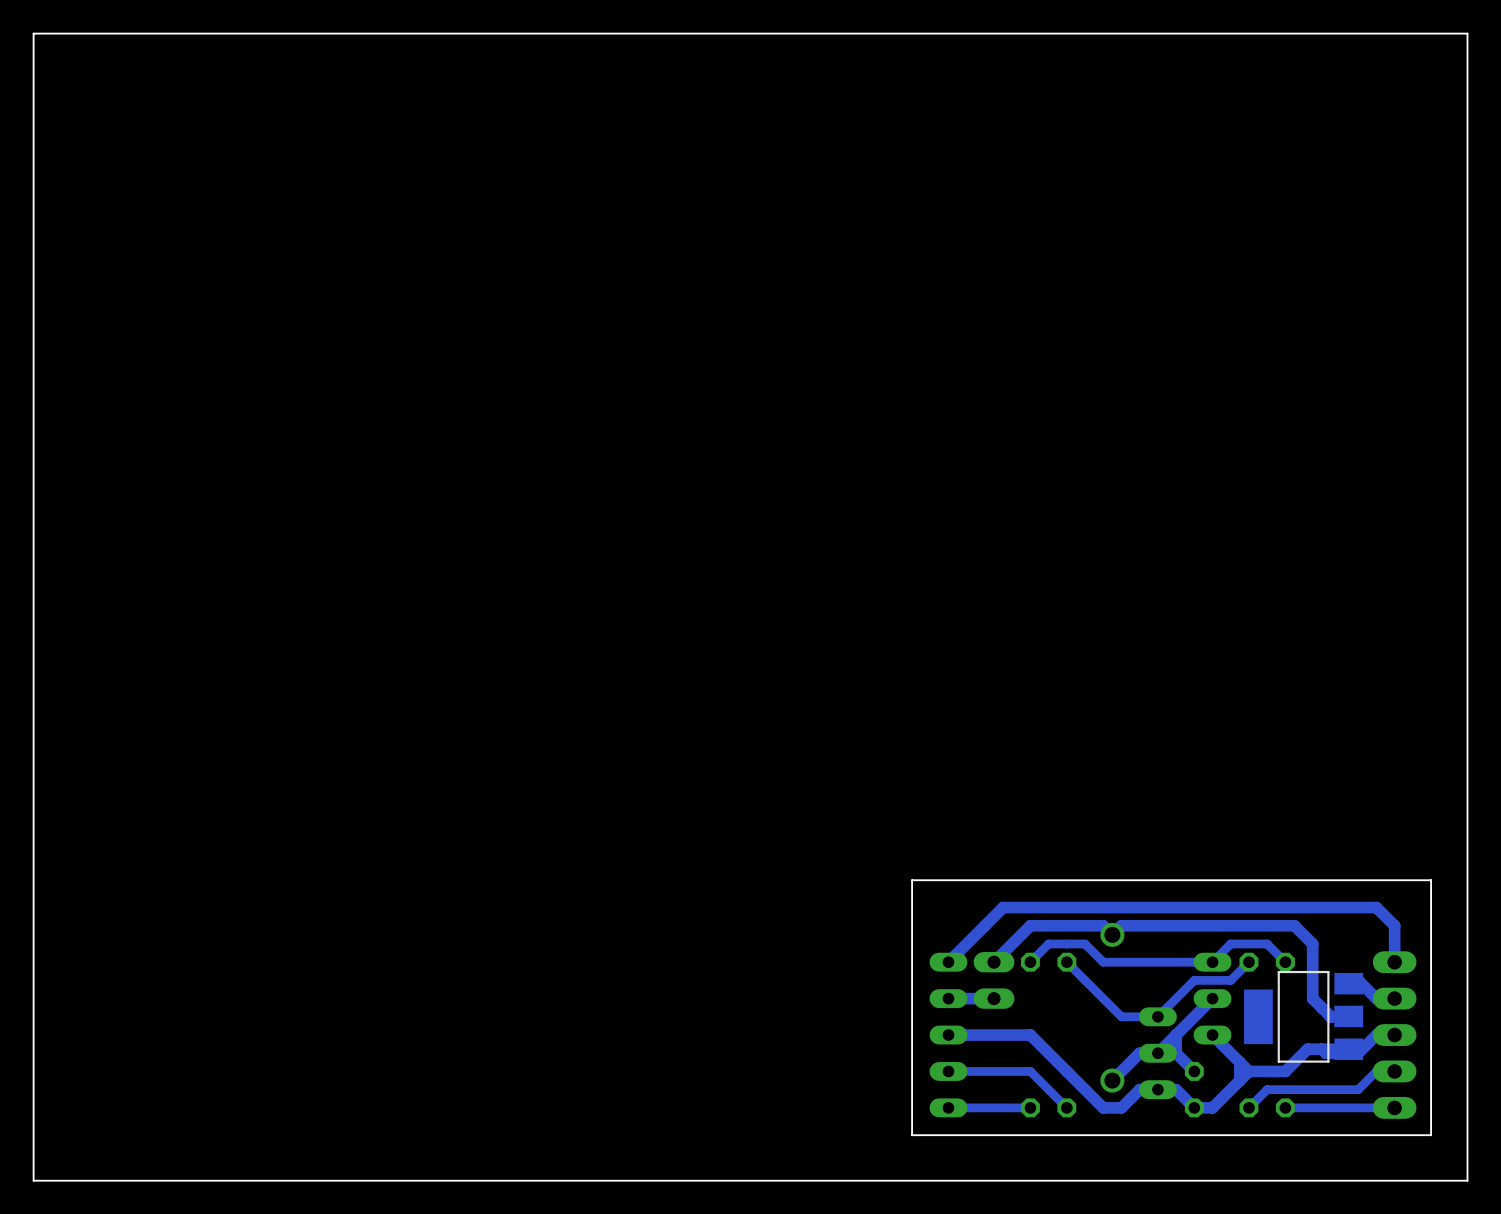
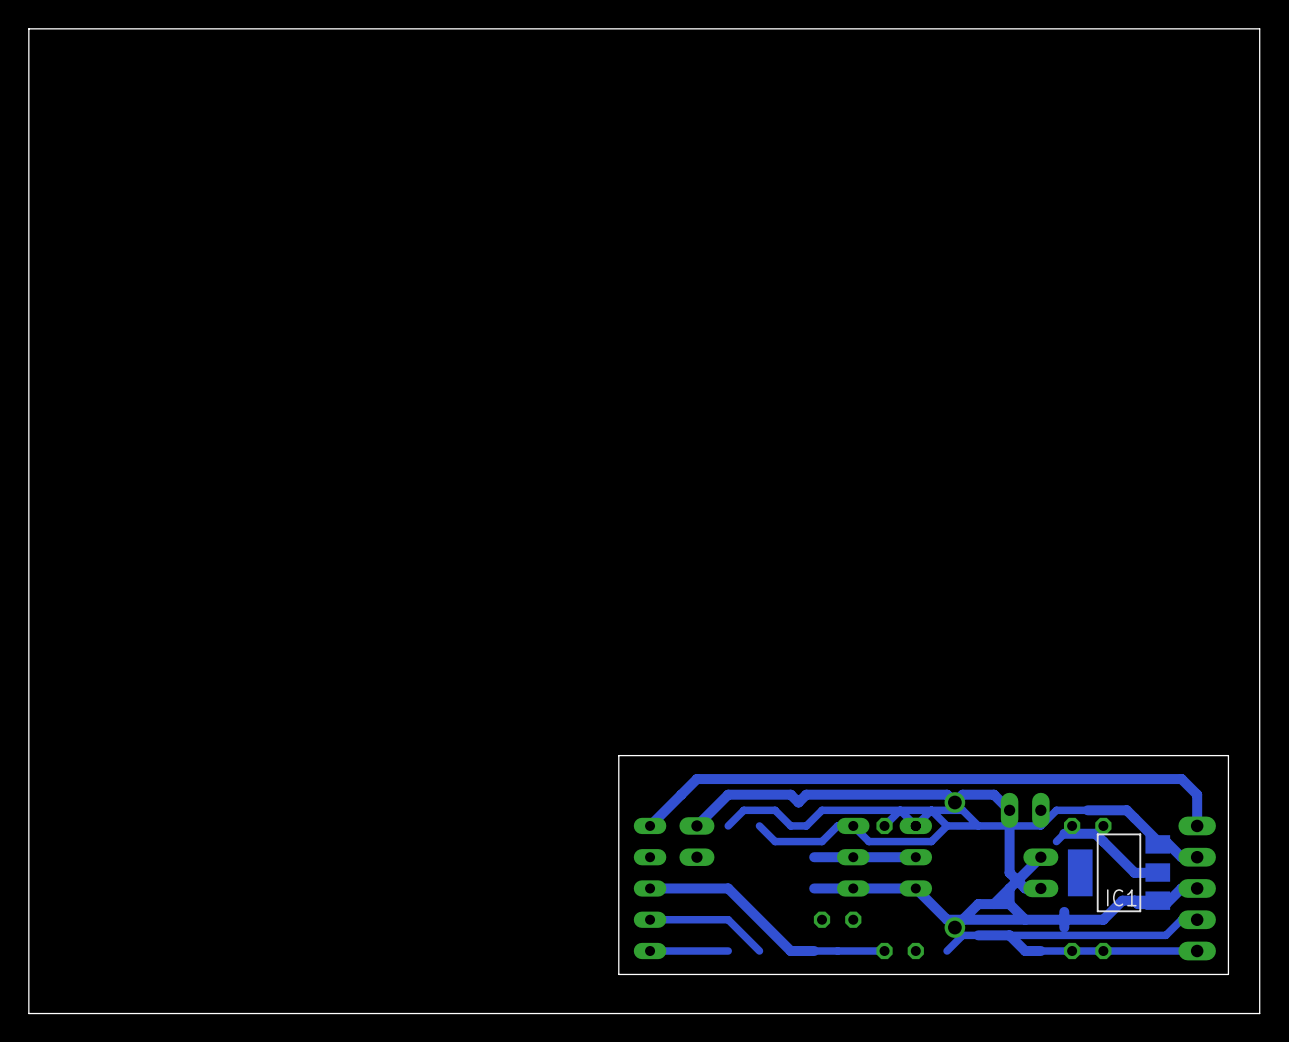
board edge: (912, 880) (912, 1135) -> (782, 755) (618, 755) (618, 974) (782, 974)
bottom track: (1003, 907) (948, 962) -> (861, 779) (696, 779) (650, 825)
bottom track: (1030, 925) (994, 962) -> (884, 794) (806, 794) (798, 802) (790, 794) (728, 794) (696, 825)
bottom track: (1157, 925) (1294, 925) (1312, 943) (1312, 998) (1330, 1016) -> (1064, 833) (1095, 833) (1134, 872) (1141, 872)
bottom track: none -> (993, 794) (1009, 810) (1009, 872) (1025, 888) (1040, 888)
part: none -> (1025, 810)
bottom track: (1267, 943) (1285, 962) -> (1087, 810) (1126, 810) (1157, 841) (1157, 844)
bottom track: (1066, 962) (1121, 1016) (1157, 1016) (1194, 980) (1230, 980) -> none
bottom track: none -> (947, 825) (931, 841) (868, 841) (853, 825) (837, 825) (822, 841) (775, 841) (759, 825)
bottom track: none -> (978, 825) (962, 810) (931, 810) (915, 825) (900, 810) (822, 810) (806, 825) (790, 825) (775, 810) (743, 810) (728, 825)
part: none -> (696, 841)
part: (994, 980) -> none
part: none -> (853, 857)
bottom track: none -> (915, 857) (853, 857)
part: none -> (915, 857)
part: (1212, 998) -> none
part: none -> (1040, 872)
bottom track: none -> (650, 888) (728, 888) (790, 951) (814, 951)
part position: (948, 1035) -> (650, 888)
bottom track: (1030, 1035) (1103, 1107) (1121, 1107) (1139, 1089) -> (947, 951) (962, 935) (978, 935)
bottom track: none -> (884, 888) (915, 888) (947, 919) (1072, 919)
bottom track: (1212, 1035) (1248, 1071) (1212, 1107) -> (1103, 951) (1040, 951)
IC1 name: none -> IC1 (1121, 897)
part: (1157, 1053) -> none
bottom track: none -> (650, 919) (728, 919) (759, 951)
bottom track: (948, 1071) (1030, 1071) (1066, 1107) -> none
part rotation: 0° (1194, 1089) -> 90° clockwise (837, 919)
part position: (1194, 1089) -> (837, 919)
bottom track: (1267, 1089) (1248, 1107) -> (1087, 935) (1009, 935)
bottom track: none -> (728, 951) (650, 951)

